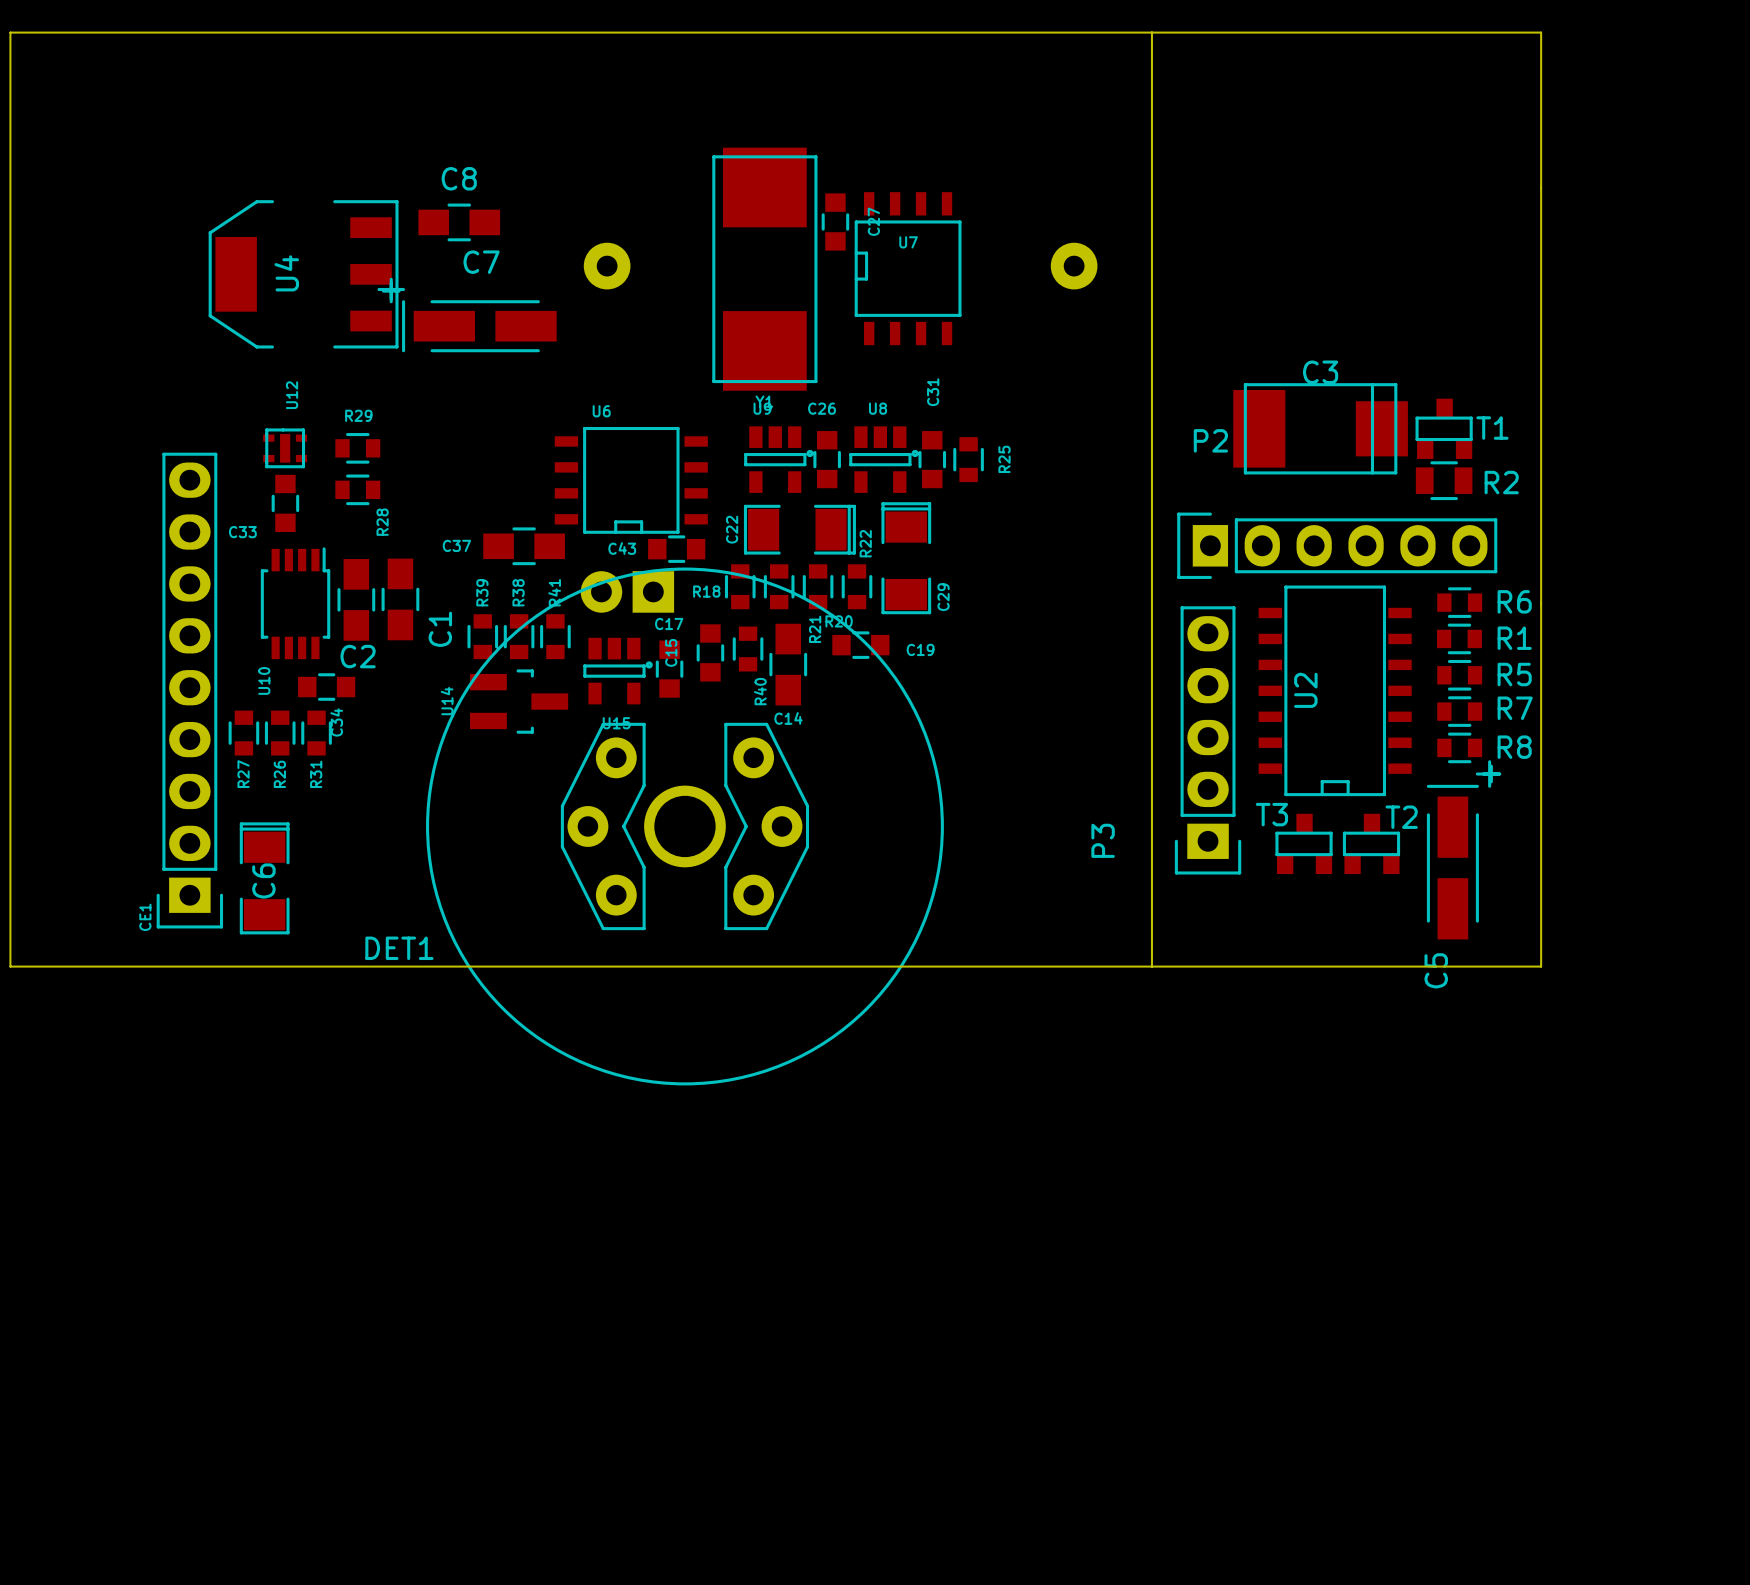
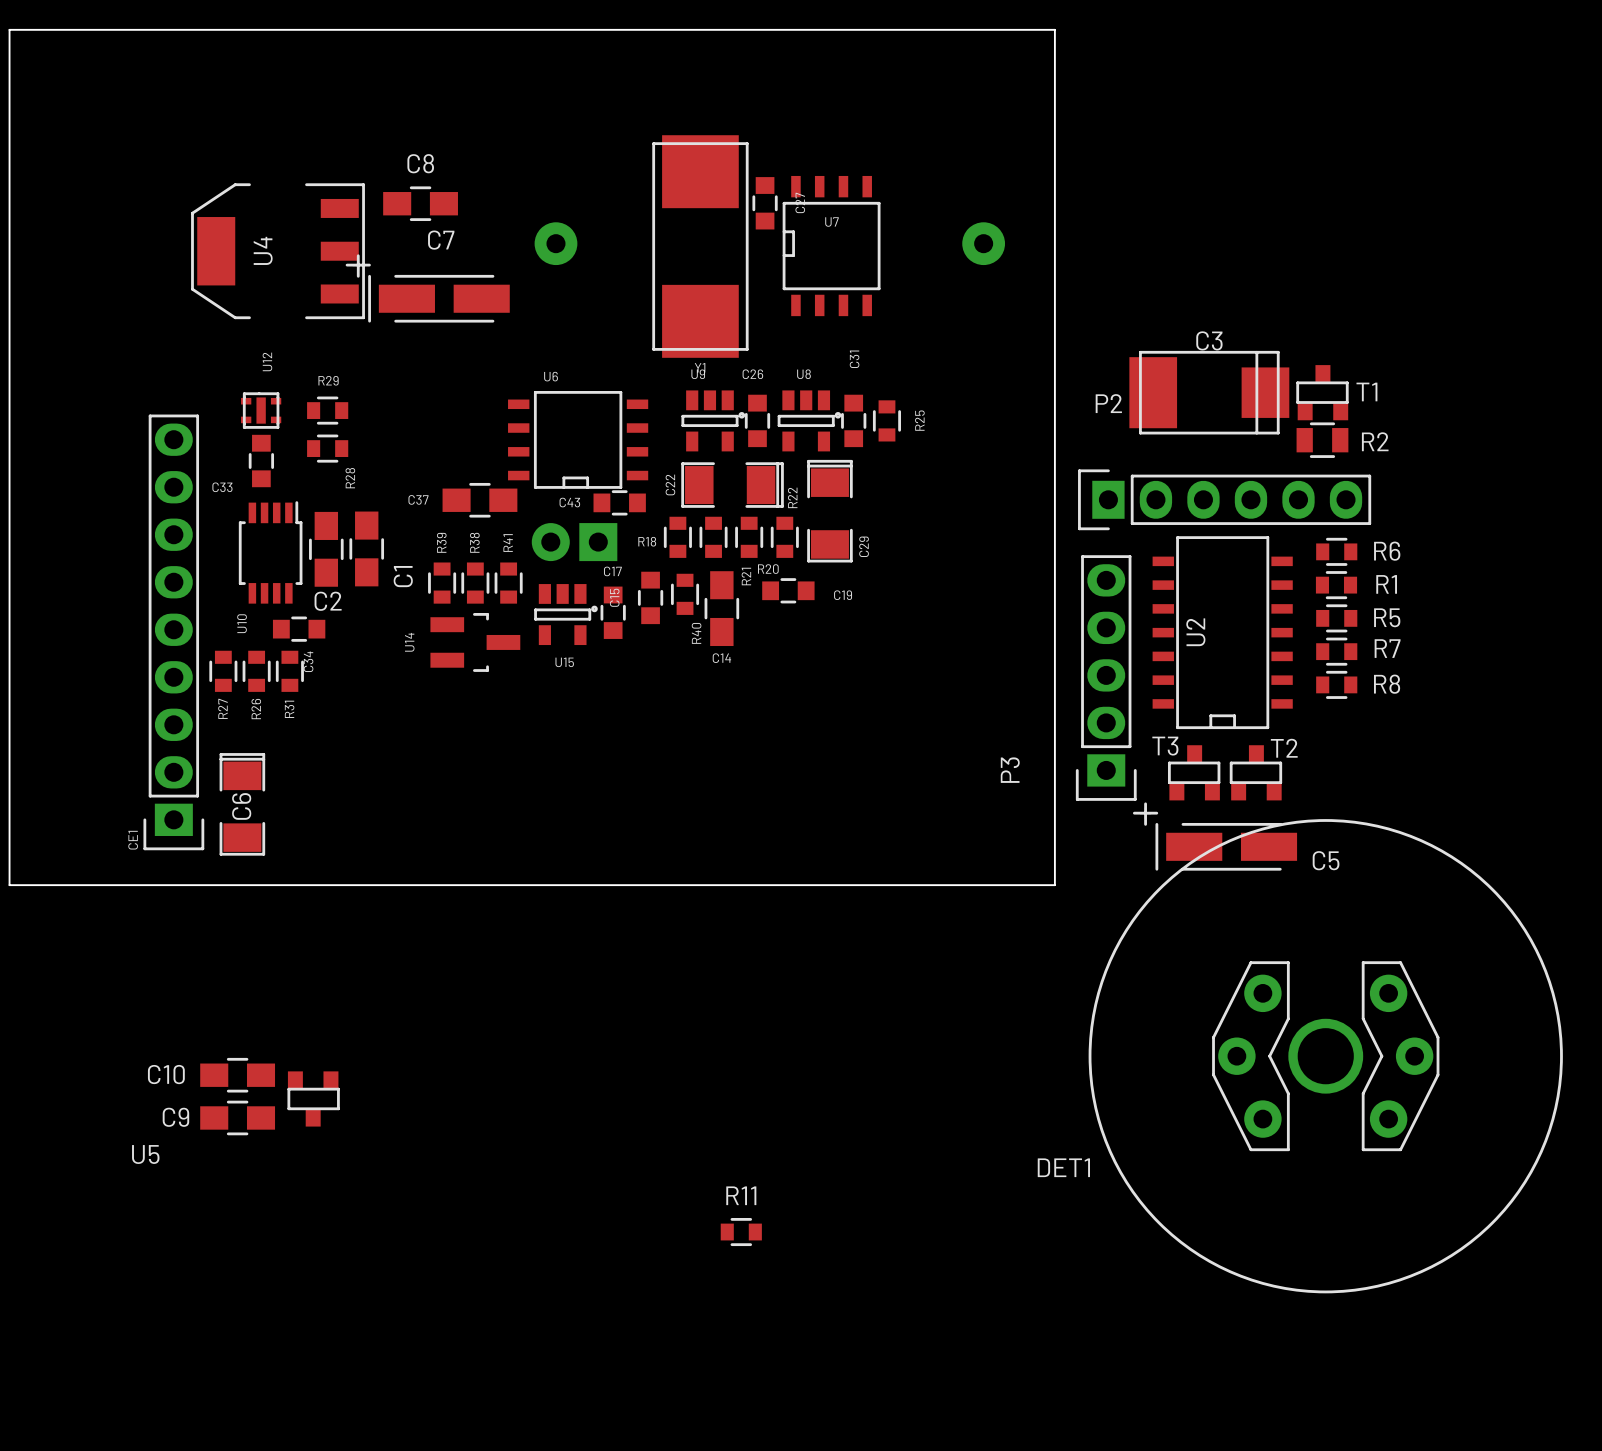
board edge: (1151, 32) (1541, 32) (1541, 966) (1151, 966) -> none
DET1 position: (684, 826) -> (1325, 1056)
C5 rotation: 0° (1464, 849) -> 90° counterclockwise (1215, 836)
C5 position: (1464, 849) -> (1215, 836)
C10: none -> (237, 1075)
U5: none -> (313, 1098)
C9: none -> (237, 1117)
R11: none -> (741, 1232)

